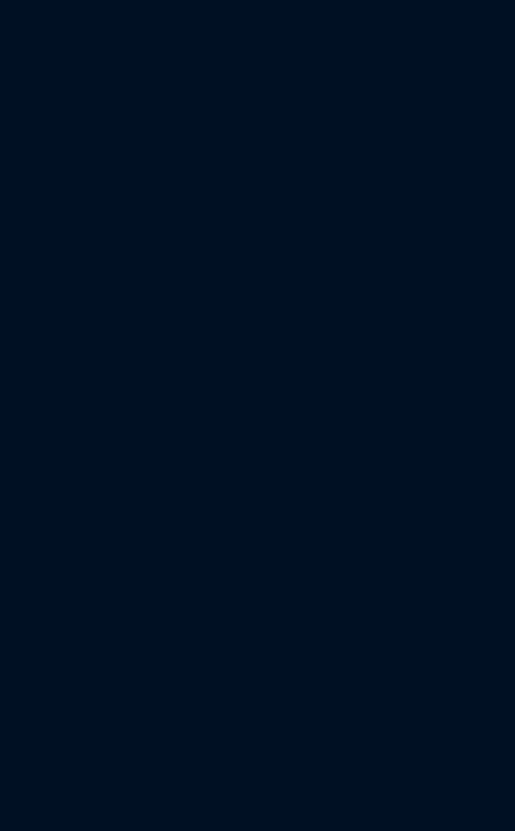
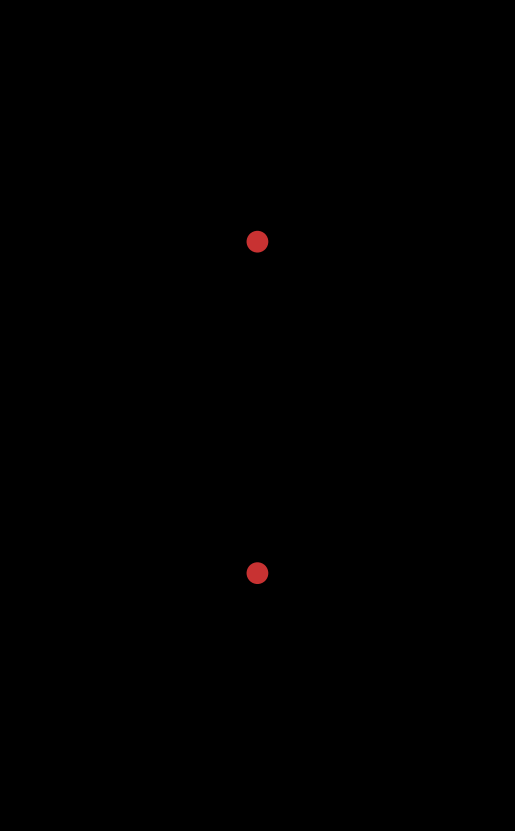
part: none -> (257, 241)
part: none -> (257, 573)

